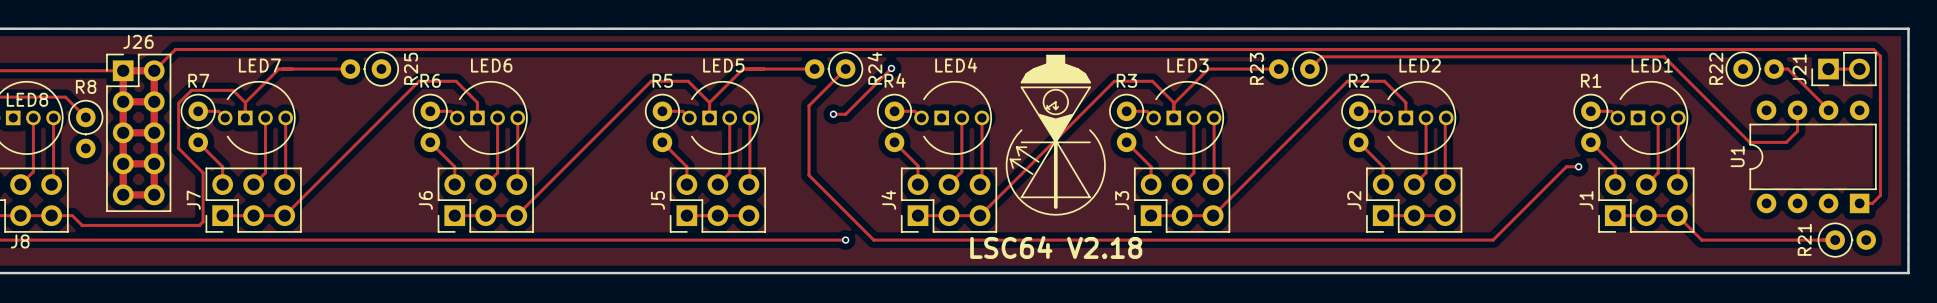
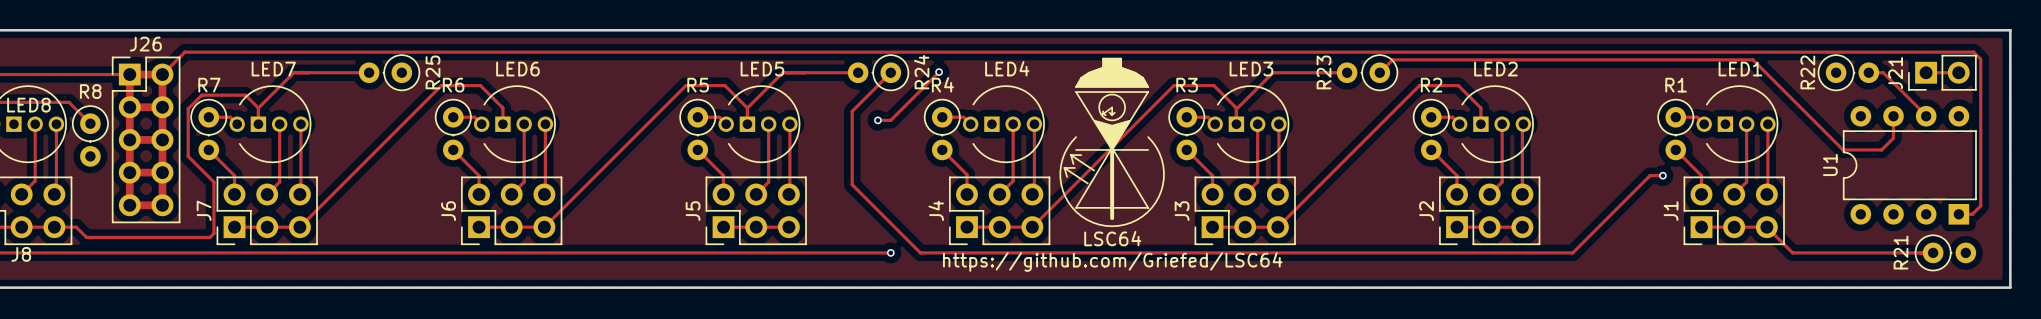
text: none -> LSC64 (1112, 238)
text: LSC64 V2.18 (1056, 247) -> https://github.com/Griefed/LSC64 (1112, 261)

